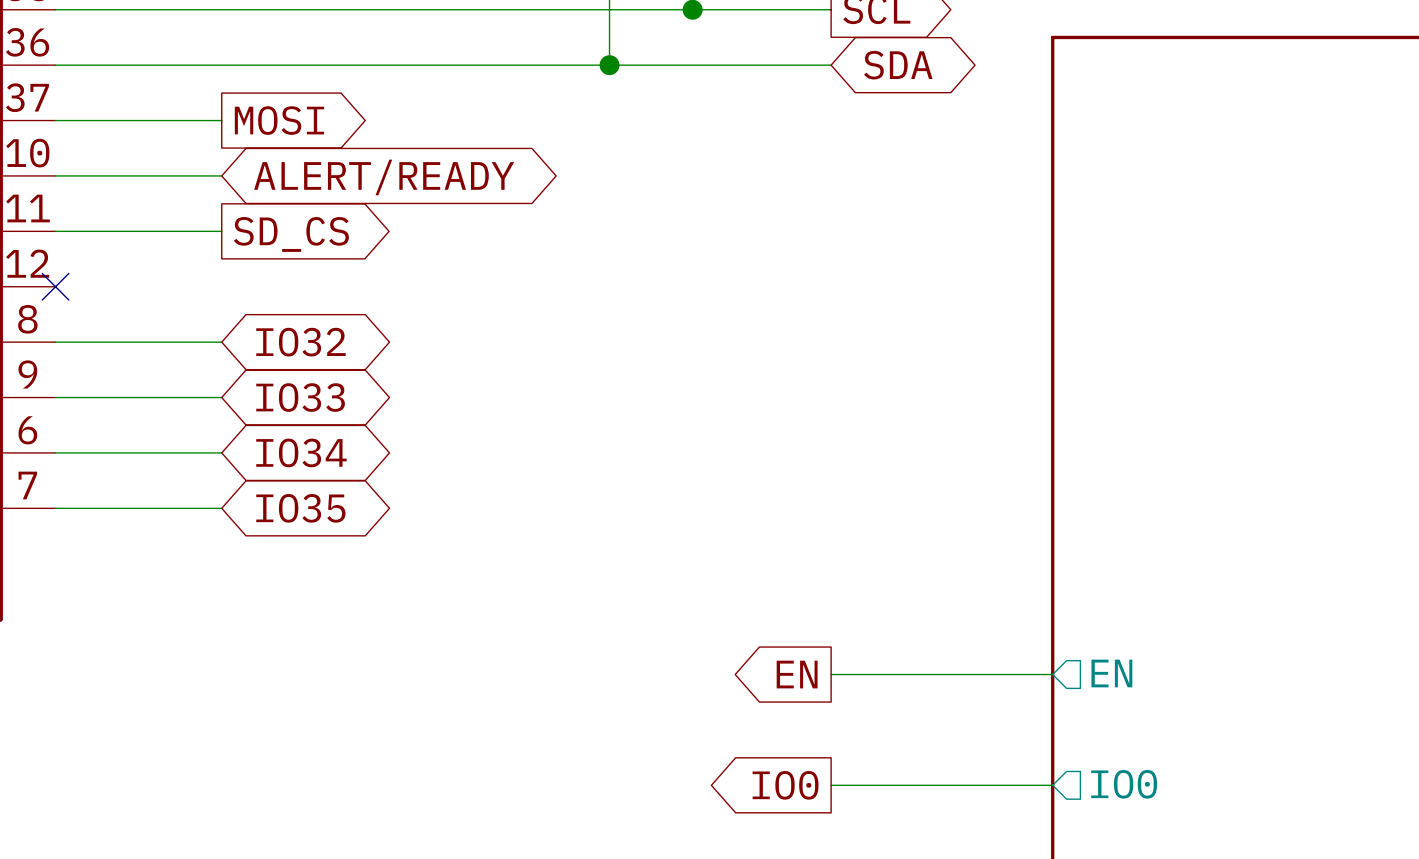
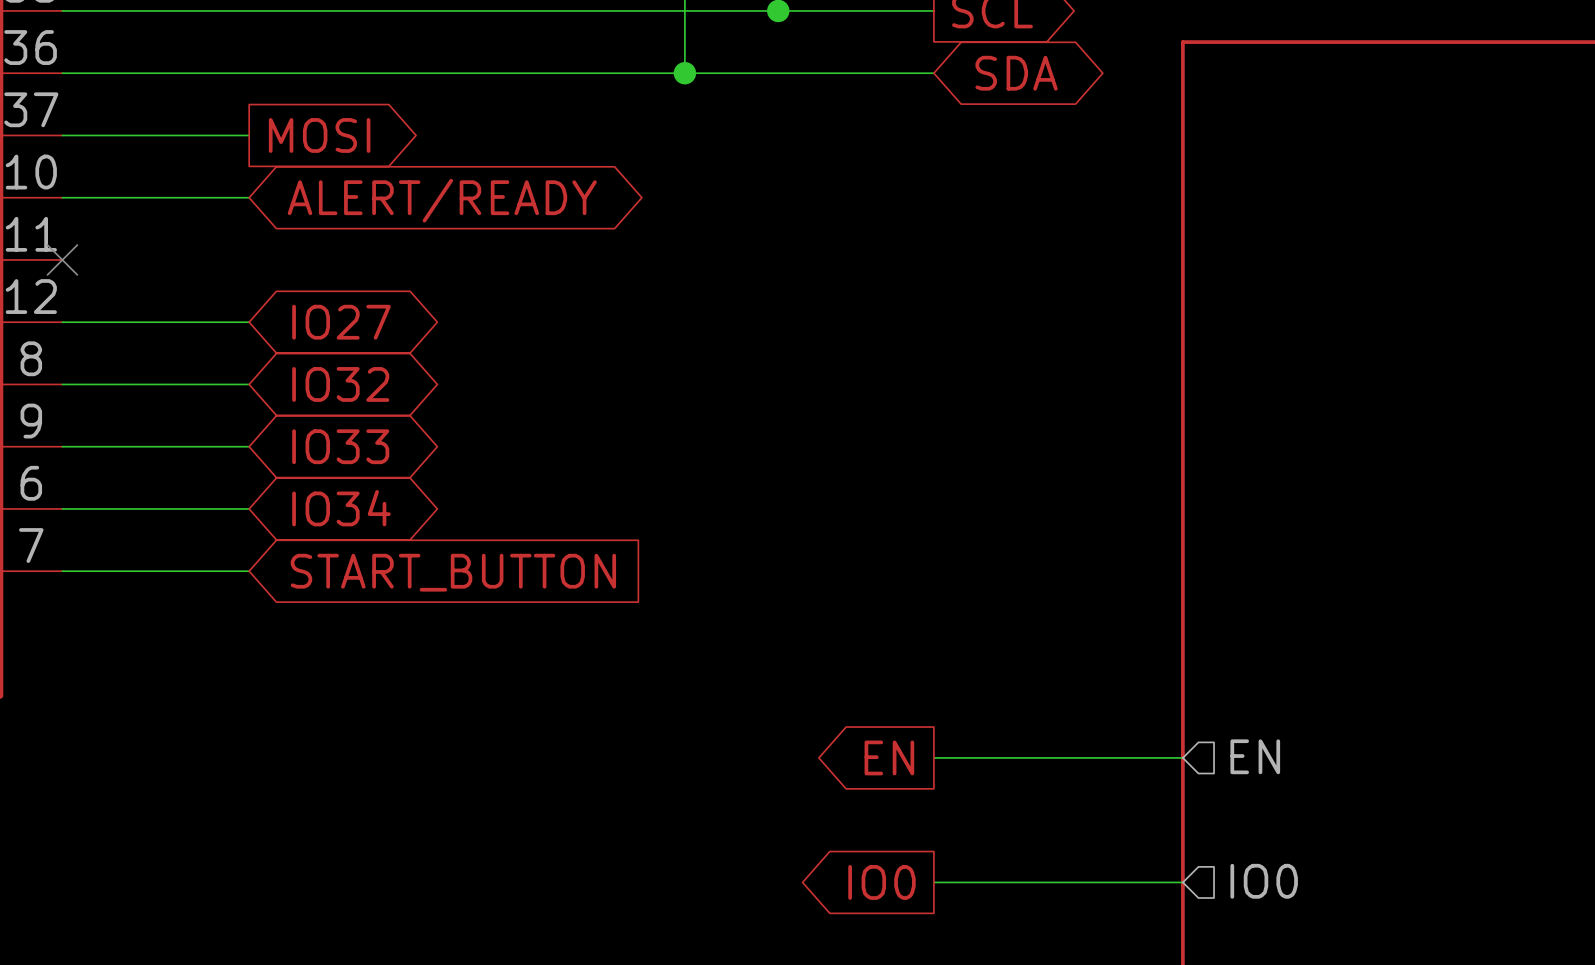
wire: (55, 231) (221, 231) -> (62, 322) (249, 322)
global label: SD_CS (291, 234) -> none
no-connect mark position: (55, 286) -> (62, 259)
global label: none -> IO27 (341, 322)
global label shape: bidirectional (300, 508) -> input (453, 572)
global label: IO35 (300, 508) -> START_BUTTON (453, 572)

